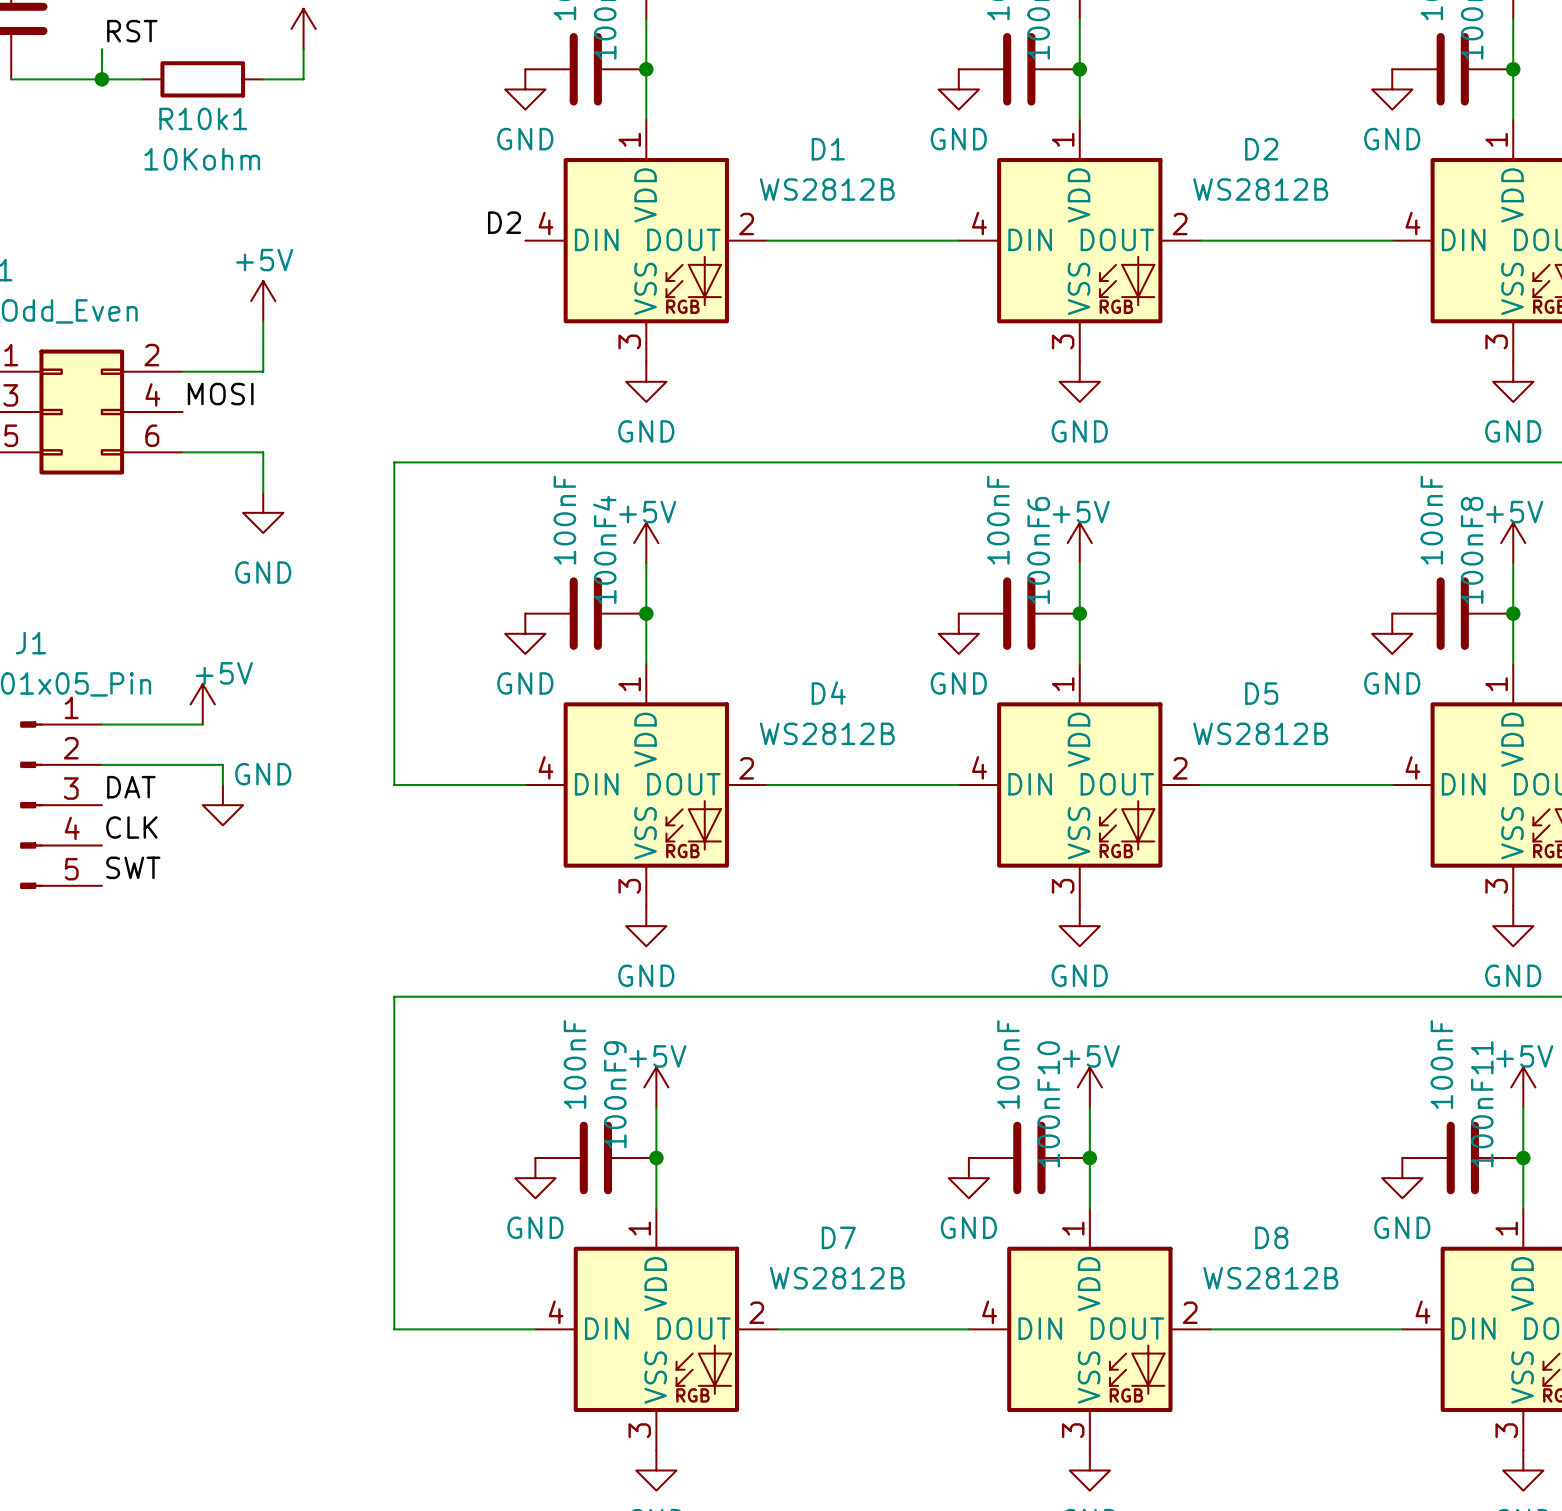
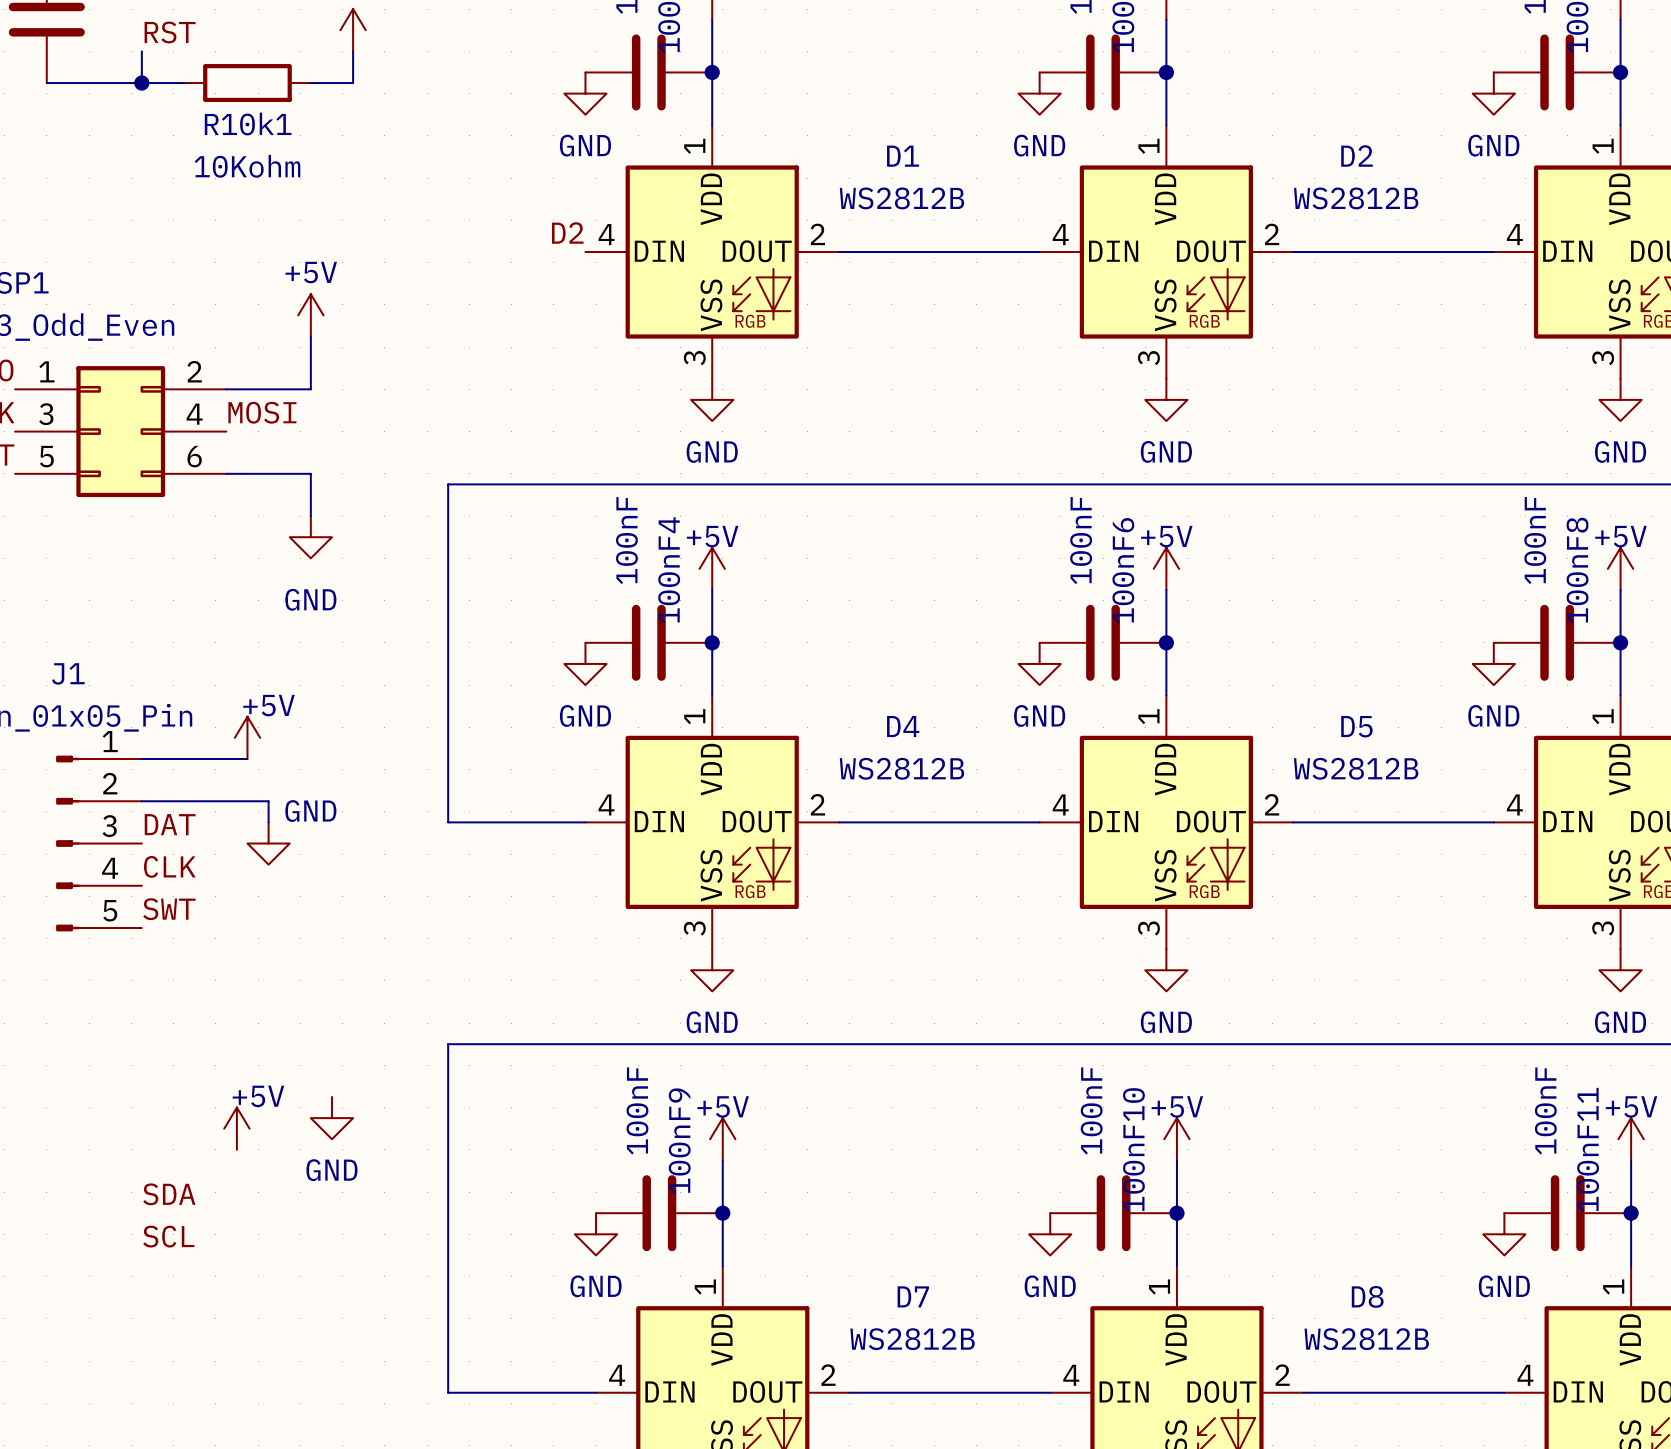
power symbol: none -> GND (331, 1118)
power symbol: none -> +5V (236, 1128)
label: none -> SDA (169, 1194)
label: none -> SCL (168, 1236)

